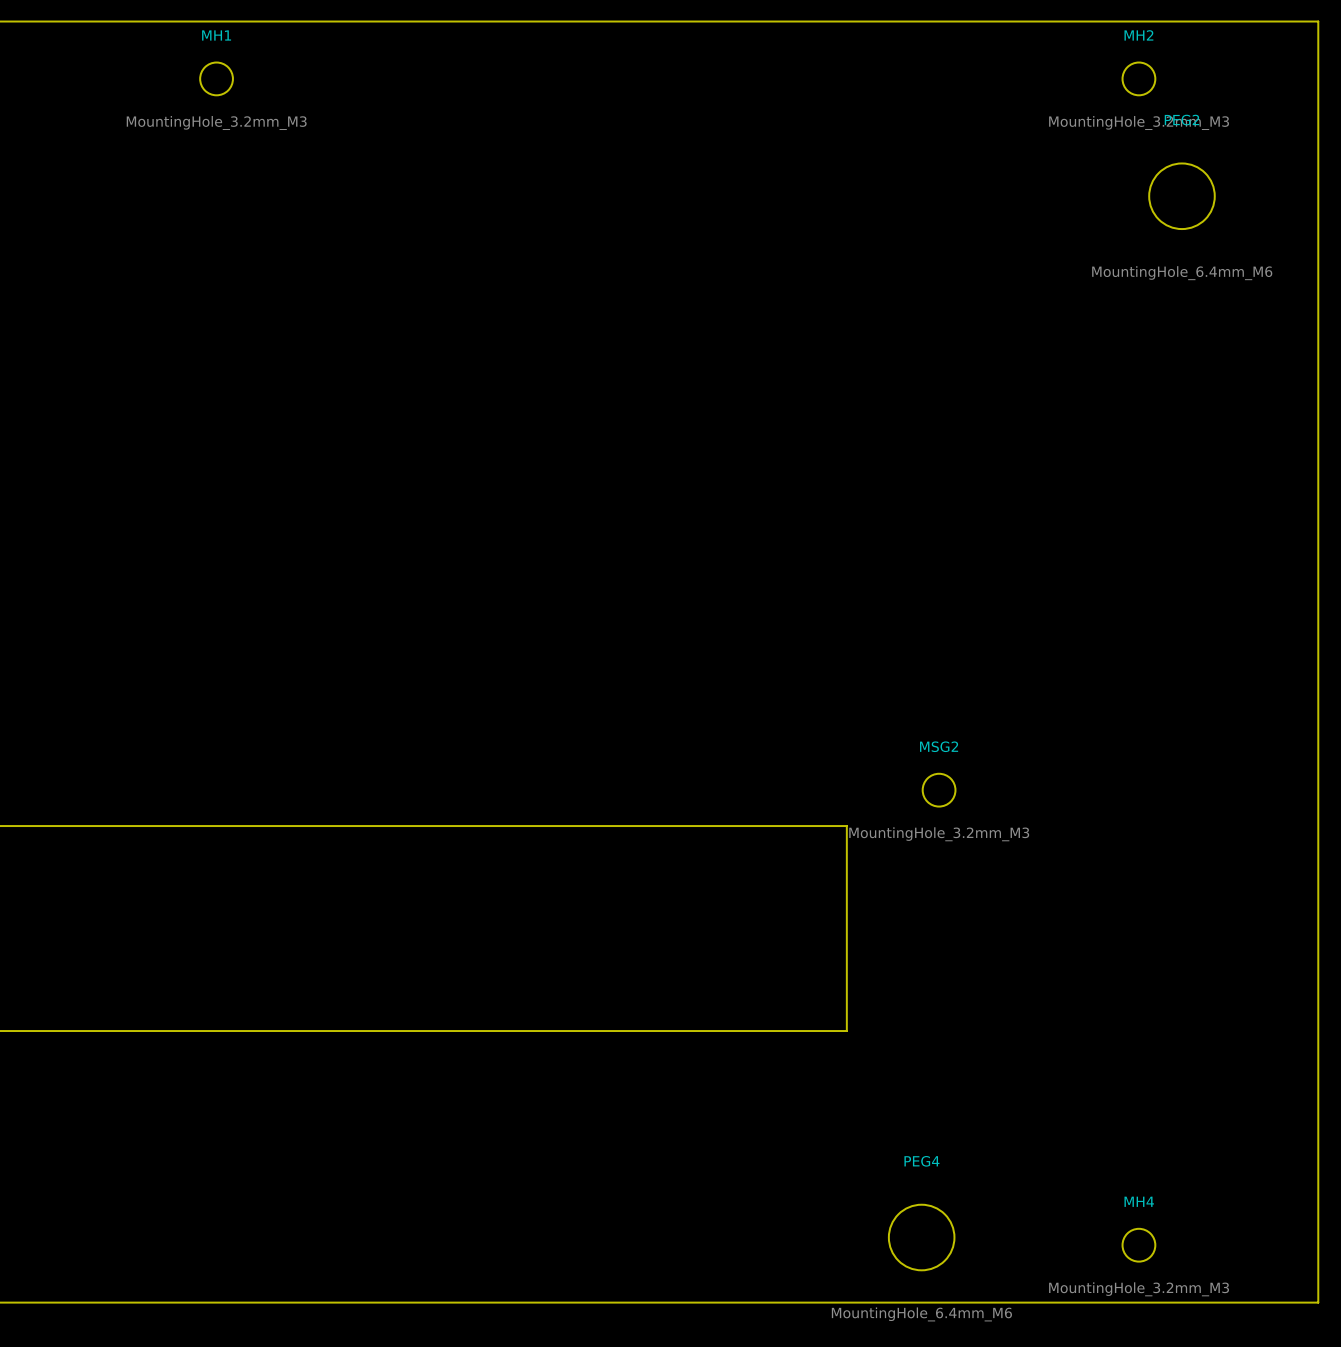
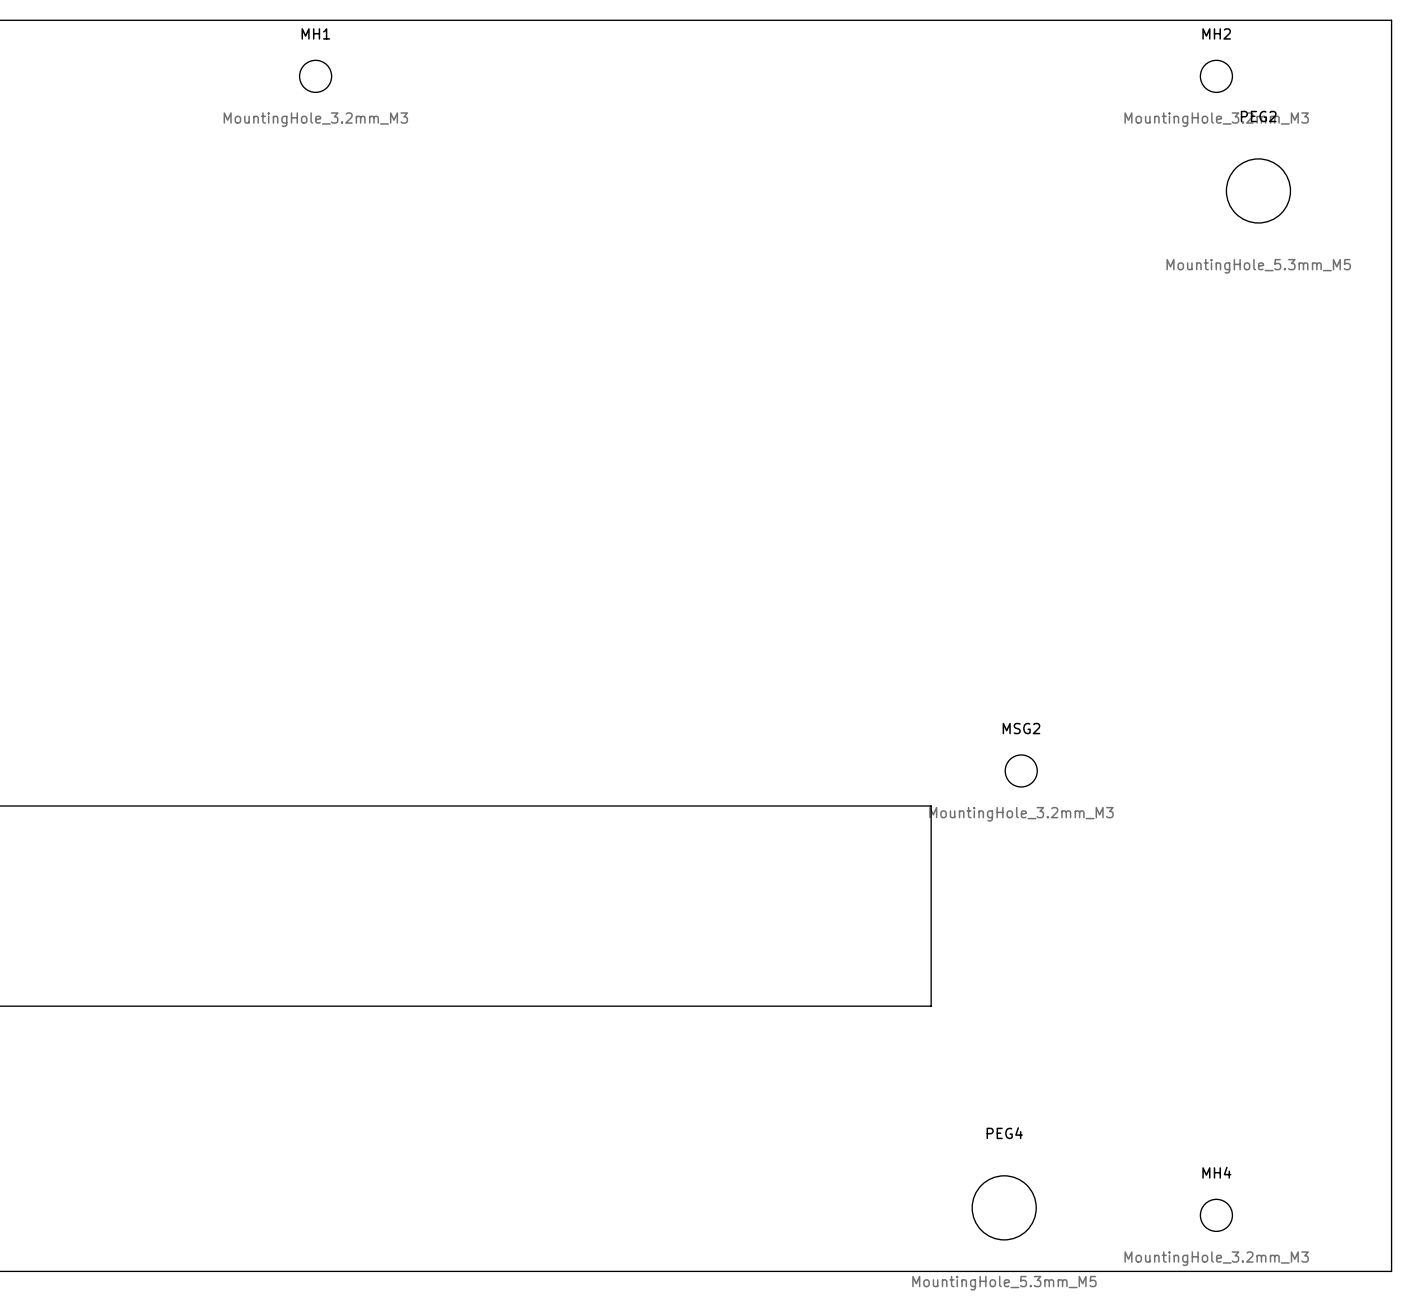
PEG2 value: MountingHole_6.4mm_M6 (1182, 273) -> MountingHole_5.3mm_M5 (1258, 266)
PEG4 value: MountingHole_6.4mm_M6 (921, 1314) -> MountingHole_5.3mm_M5 (1004, 1283)

